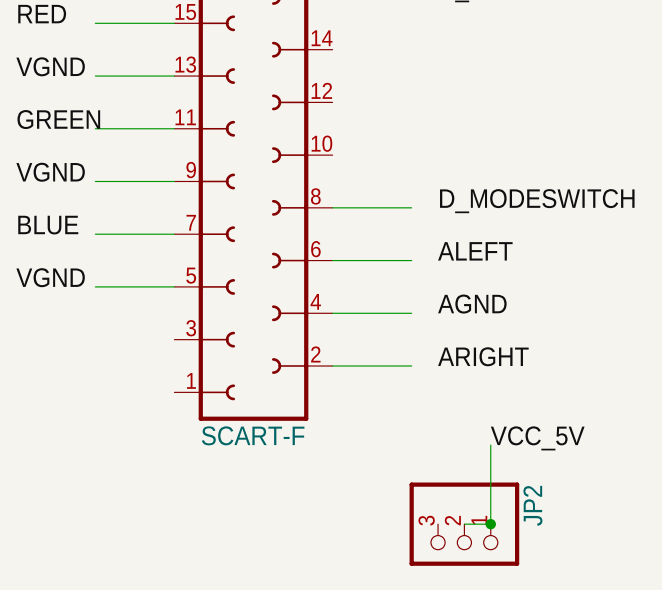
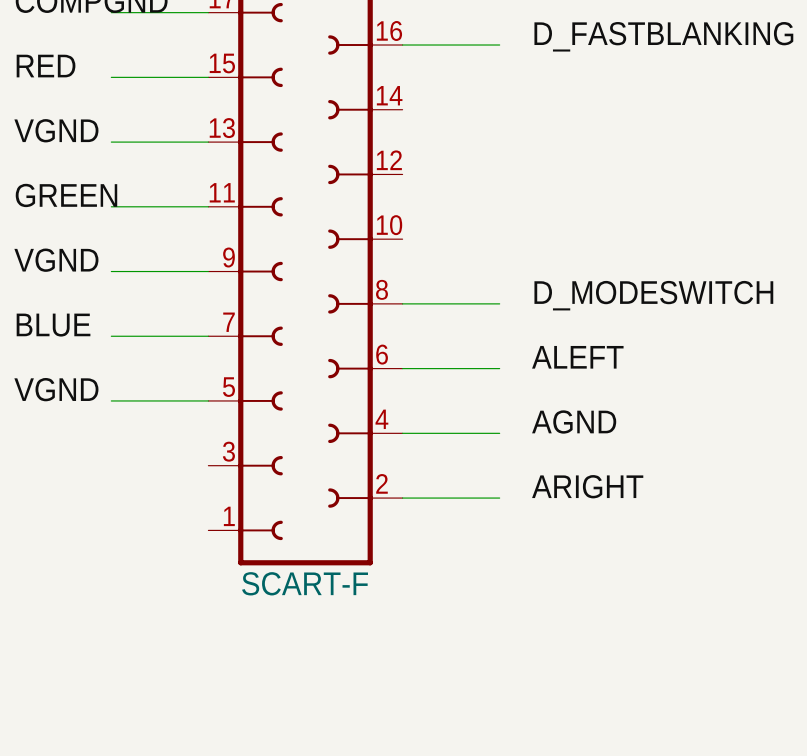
label: VCC_5V (537, 438) -> none
wire: (490, 445) (490, 524) (464, 524) -> none
JP2: (464, 524) -> none
junction: (490, 524) -> none

